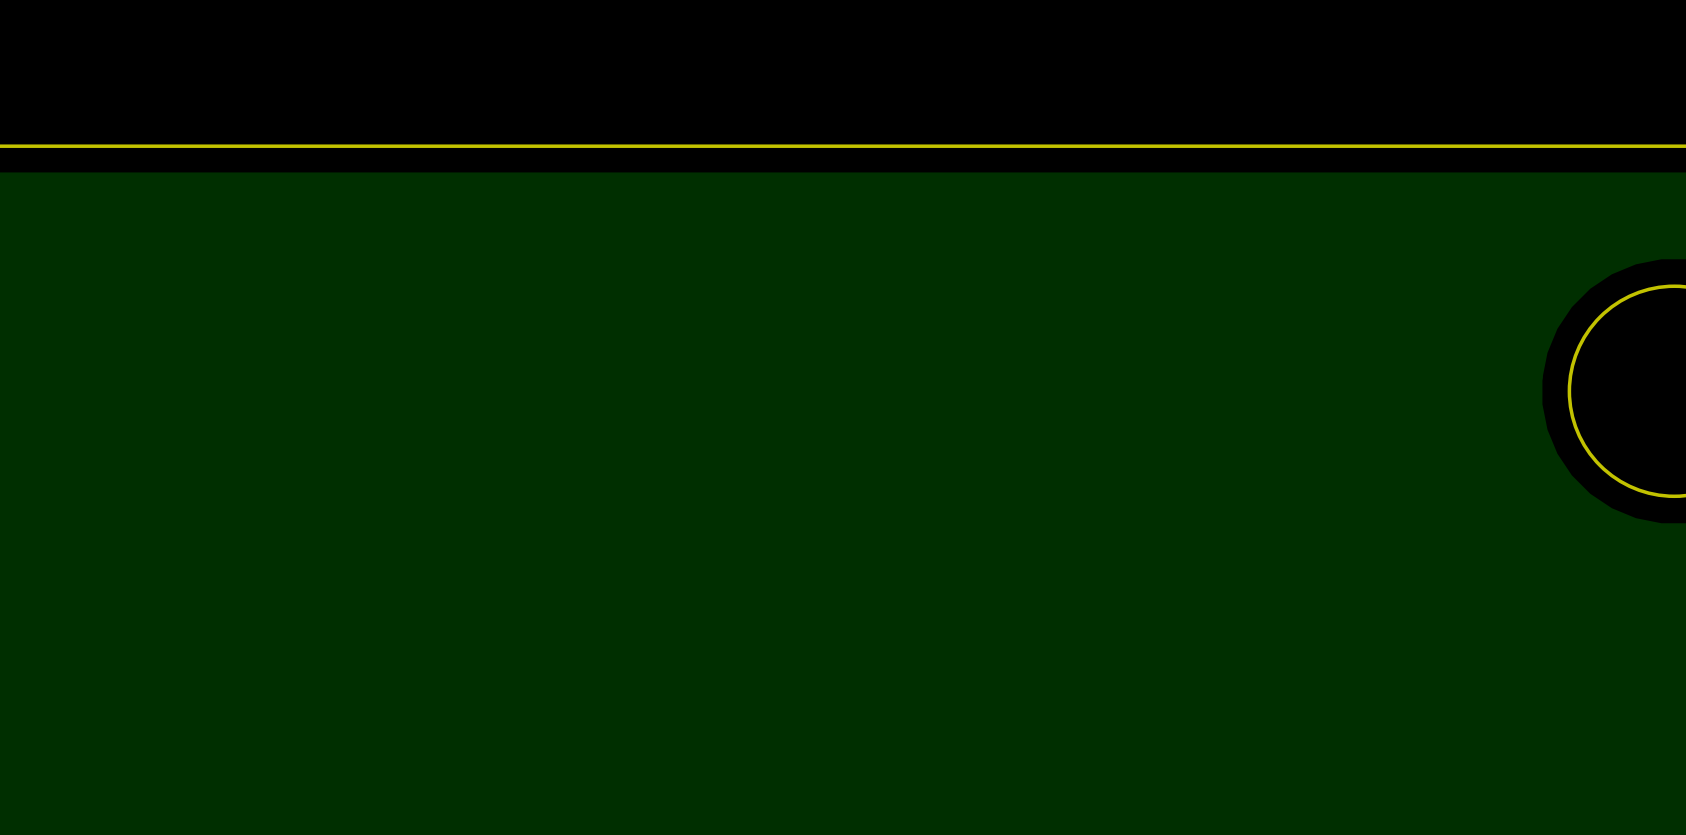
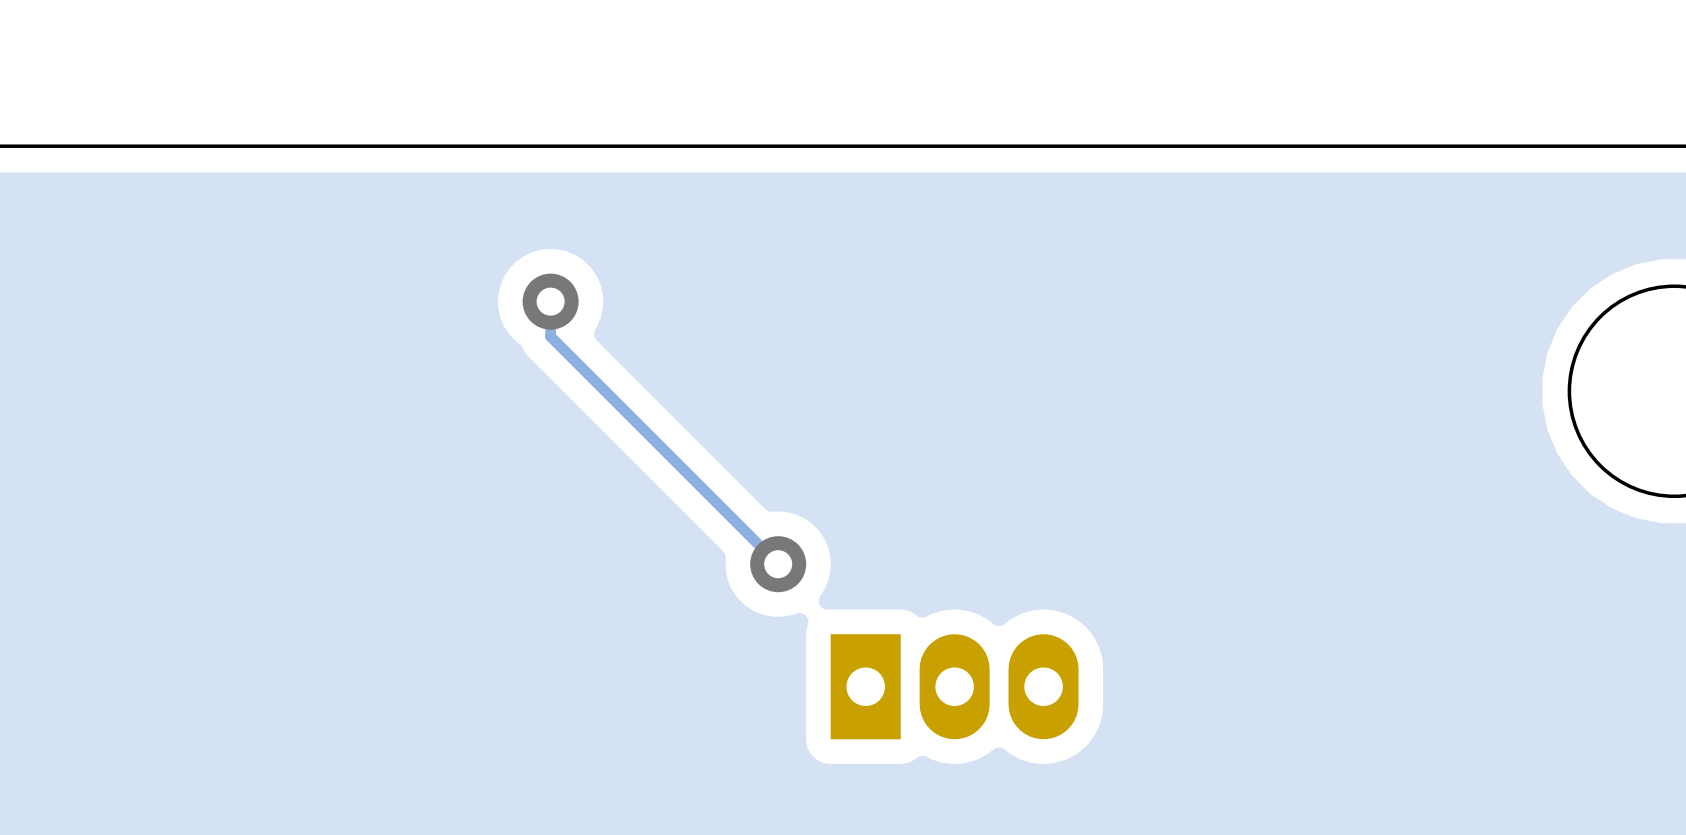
track: none -> (550, 301) (550, 336) (778, 564)
via: none -> (550, 301)
via: none -> (778, 564)
part: none -> (954, 686)

